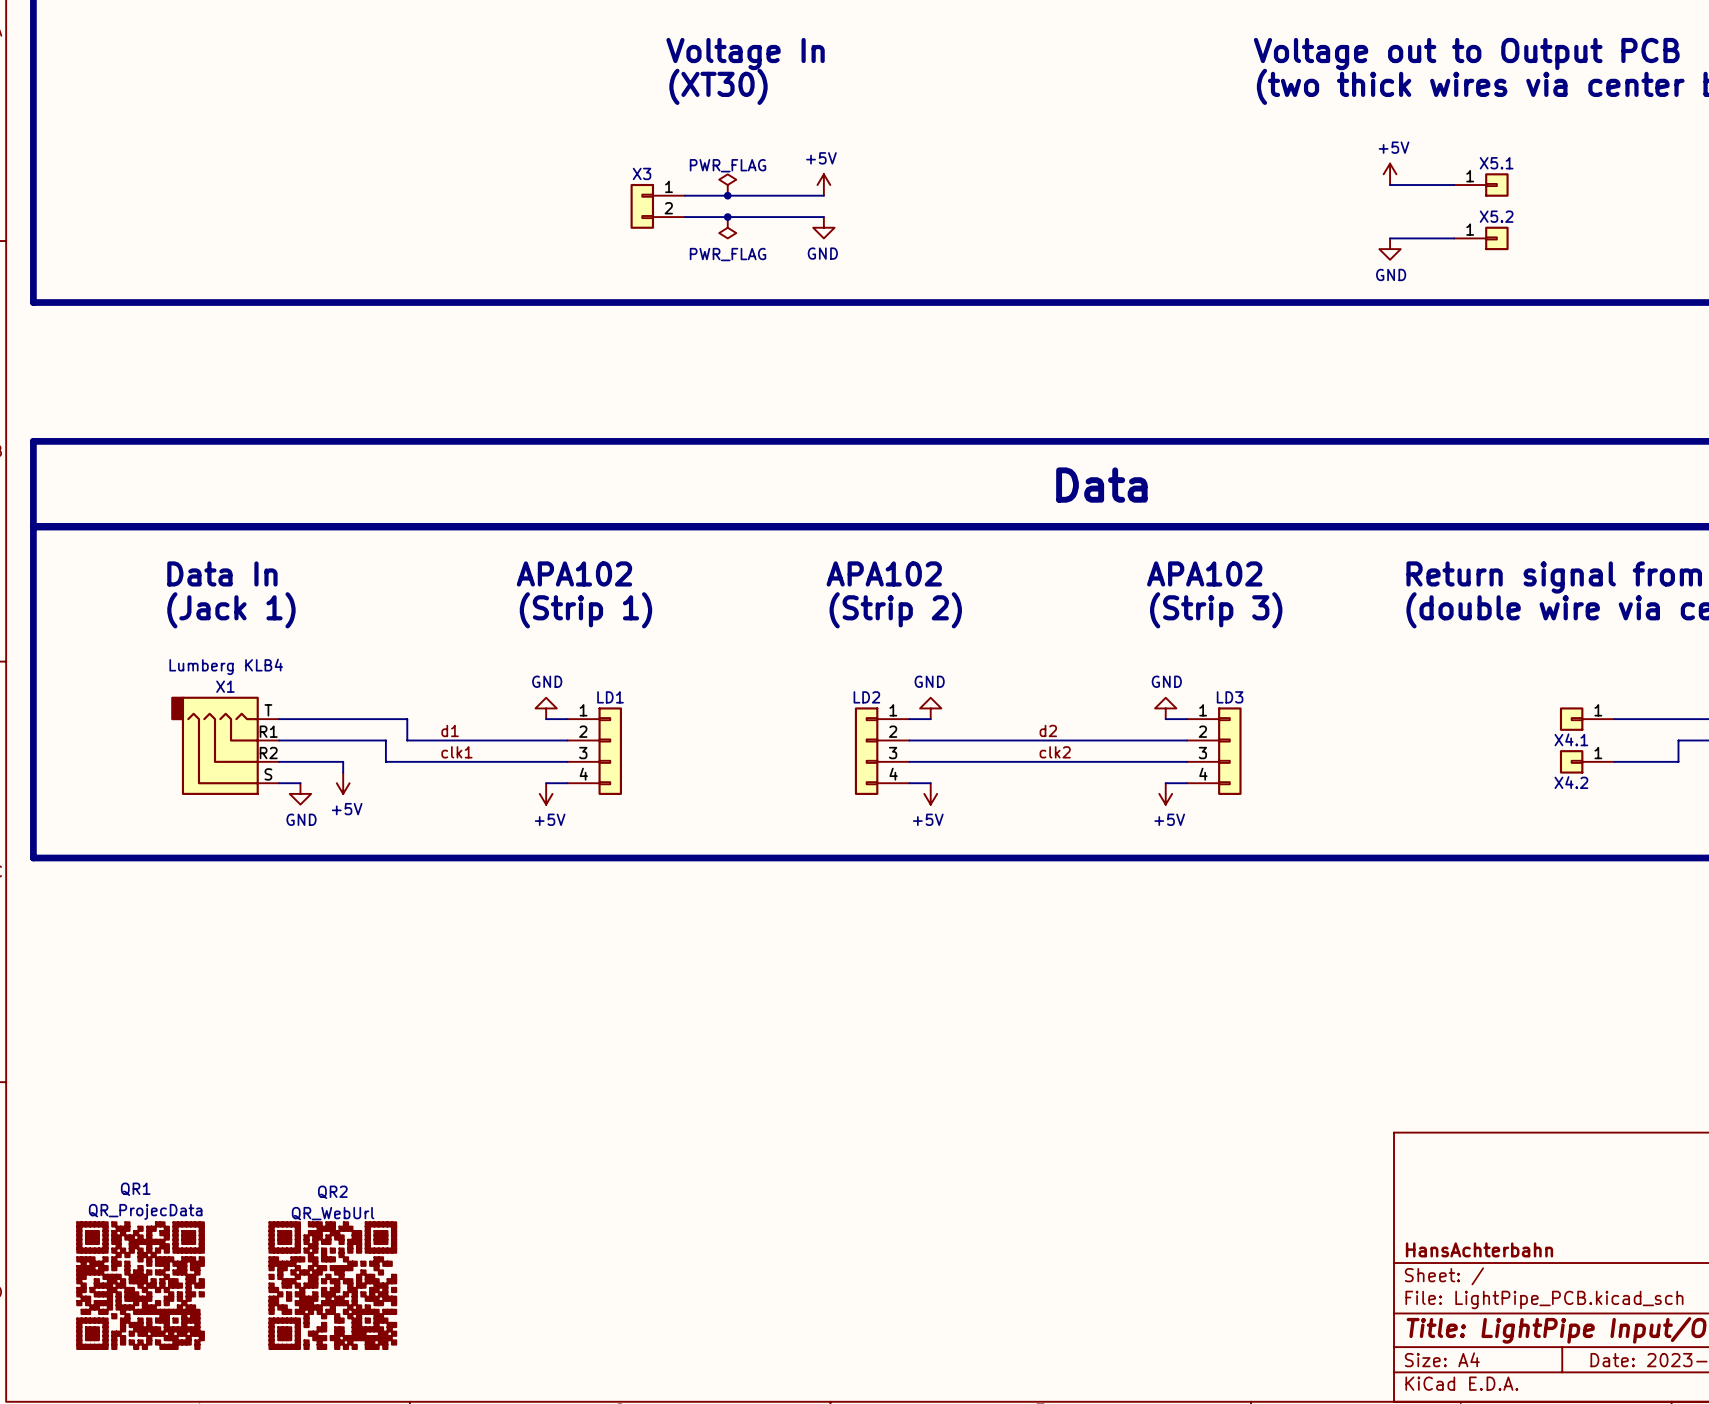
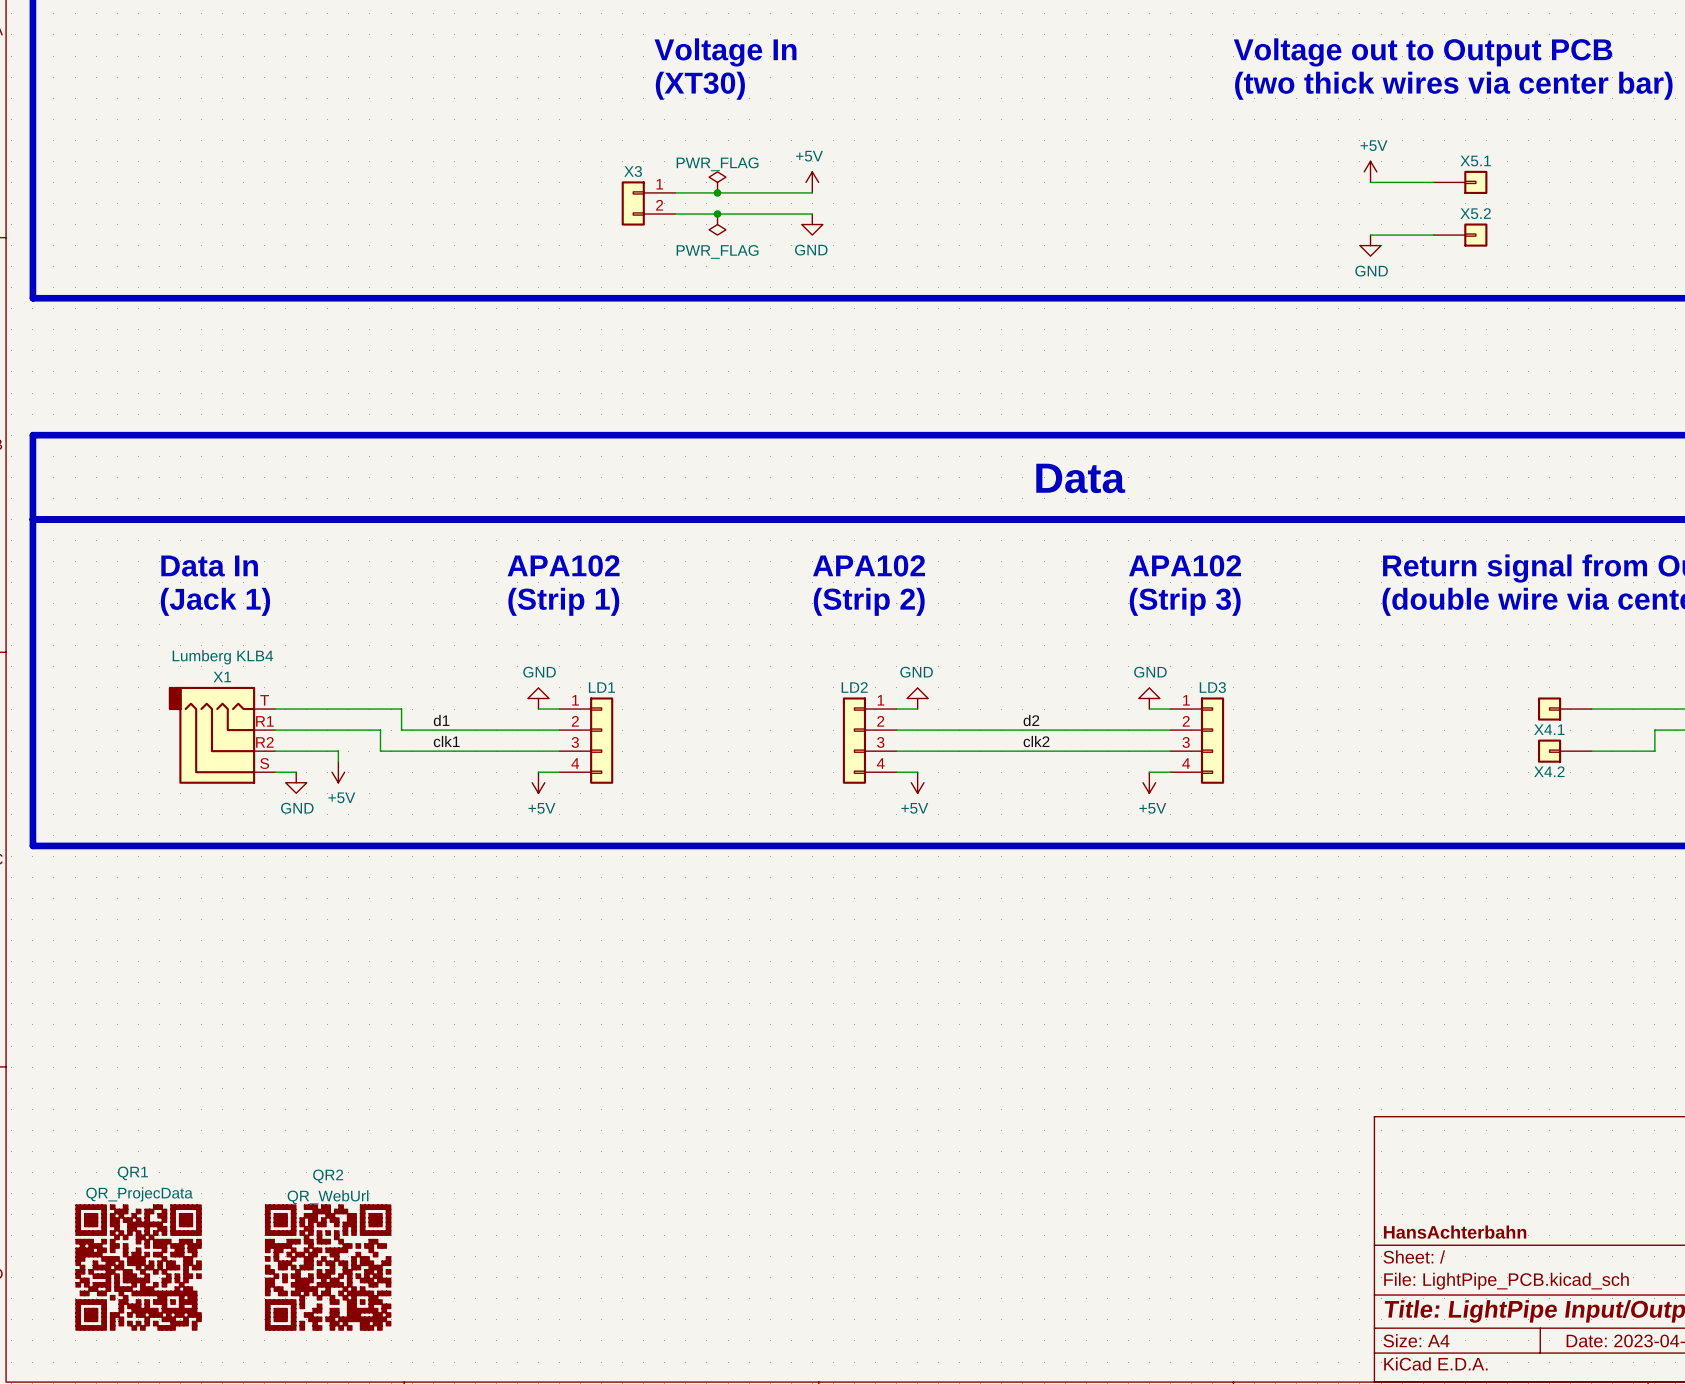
X5.1 pin number: 1 (1470, 176) -> none
X5.2 pin number: 1 (1470, 229) -> none
X4.1 pin number: 1 (1598, 710) -> none
X4.2 pin number: 1 (1598, 753) -> none

